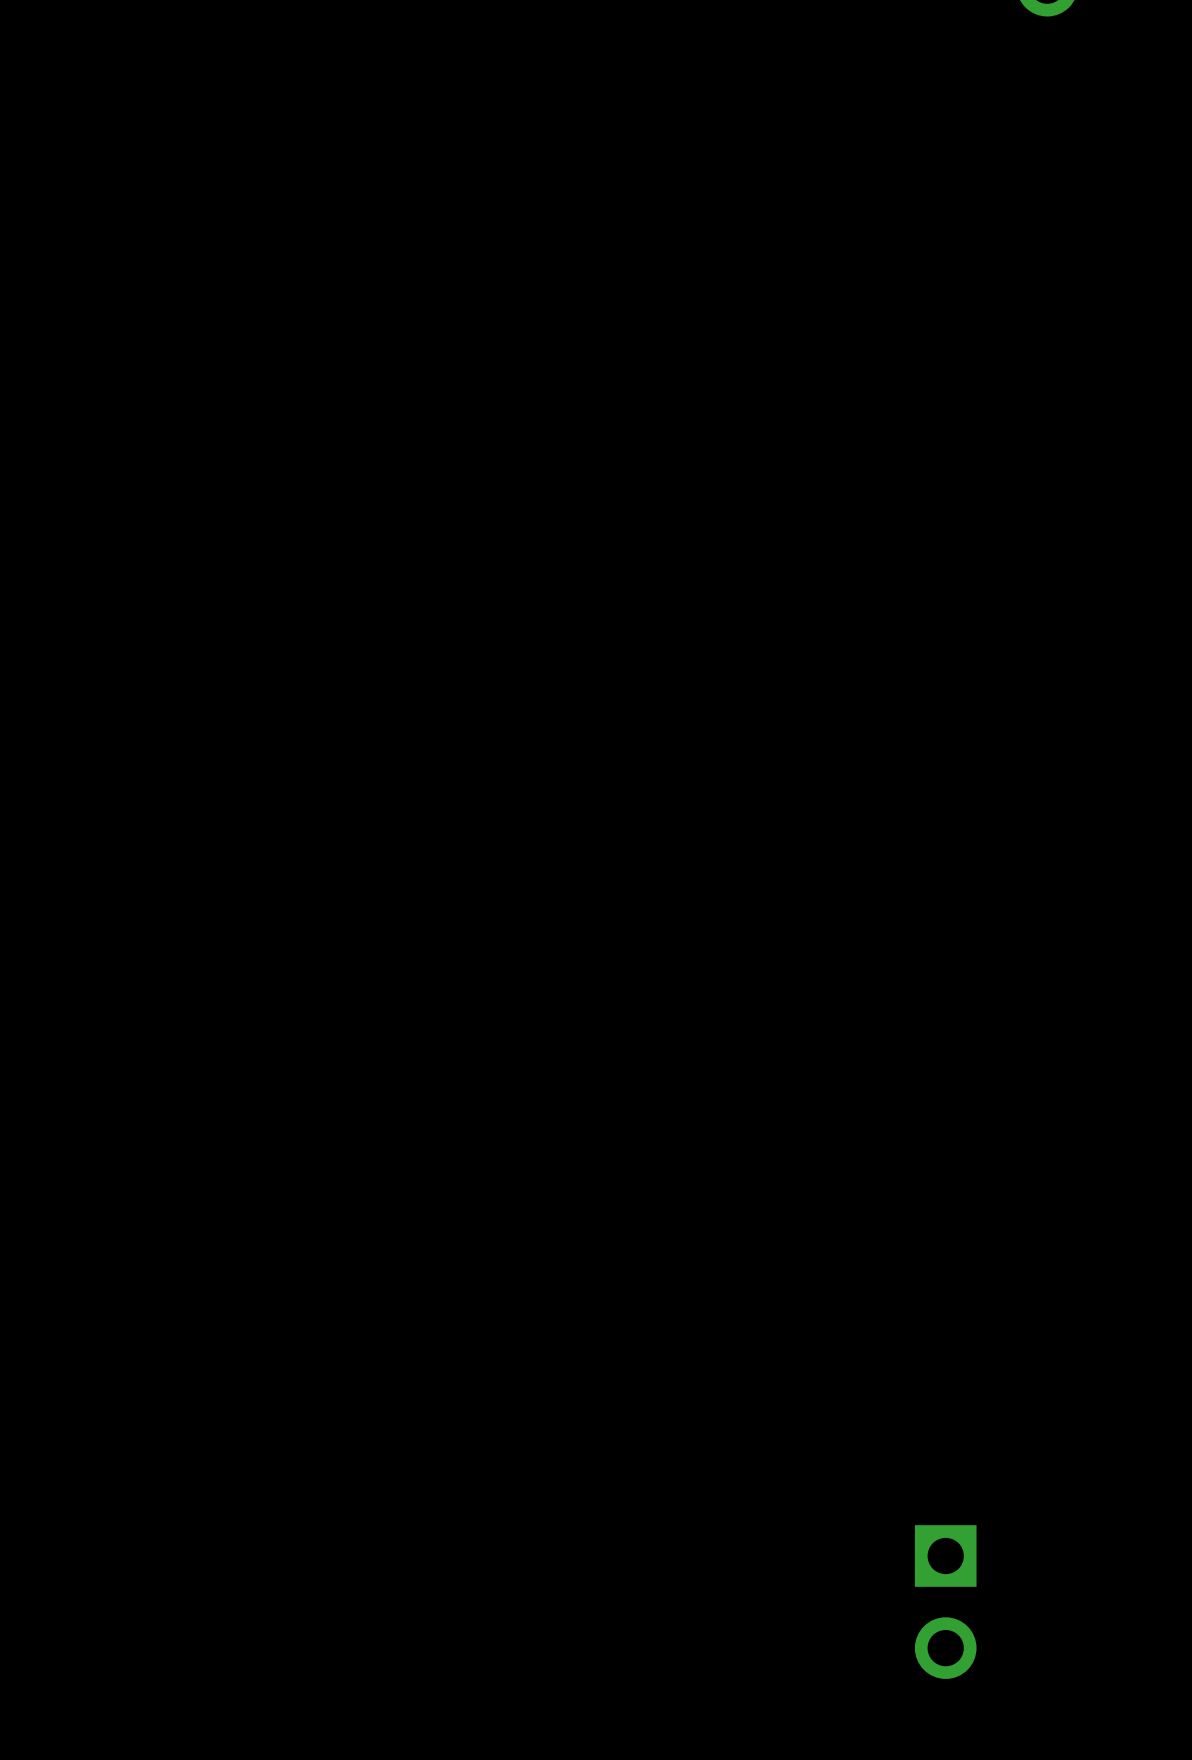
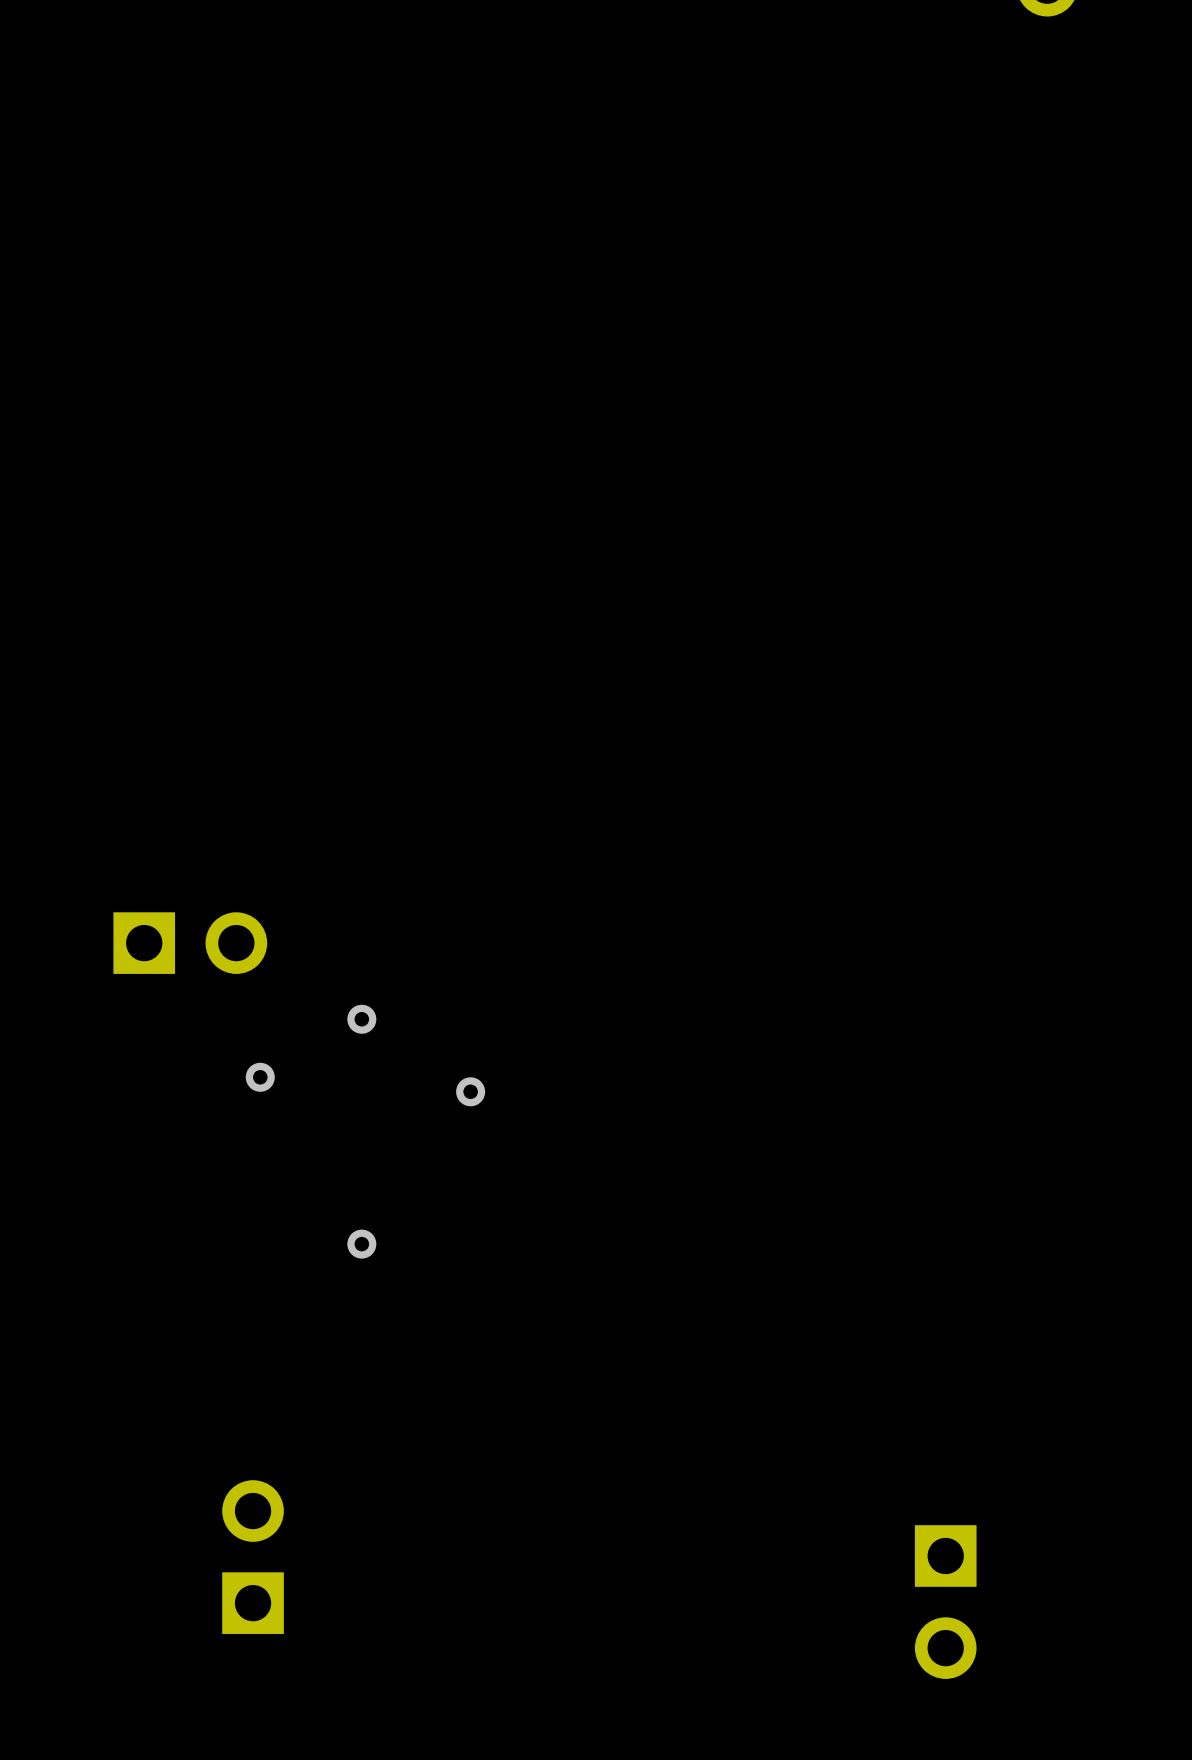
part: none -> (190, 943)
via: none -> (361, 1019)
via: none -> (260, 1077)
via: none -> (470, 1091)
via: none -> (361, 1244)
part: none -> (253, 1557)

